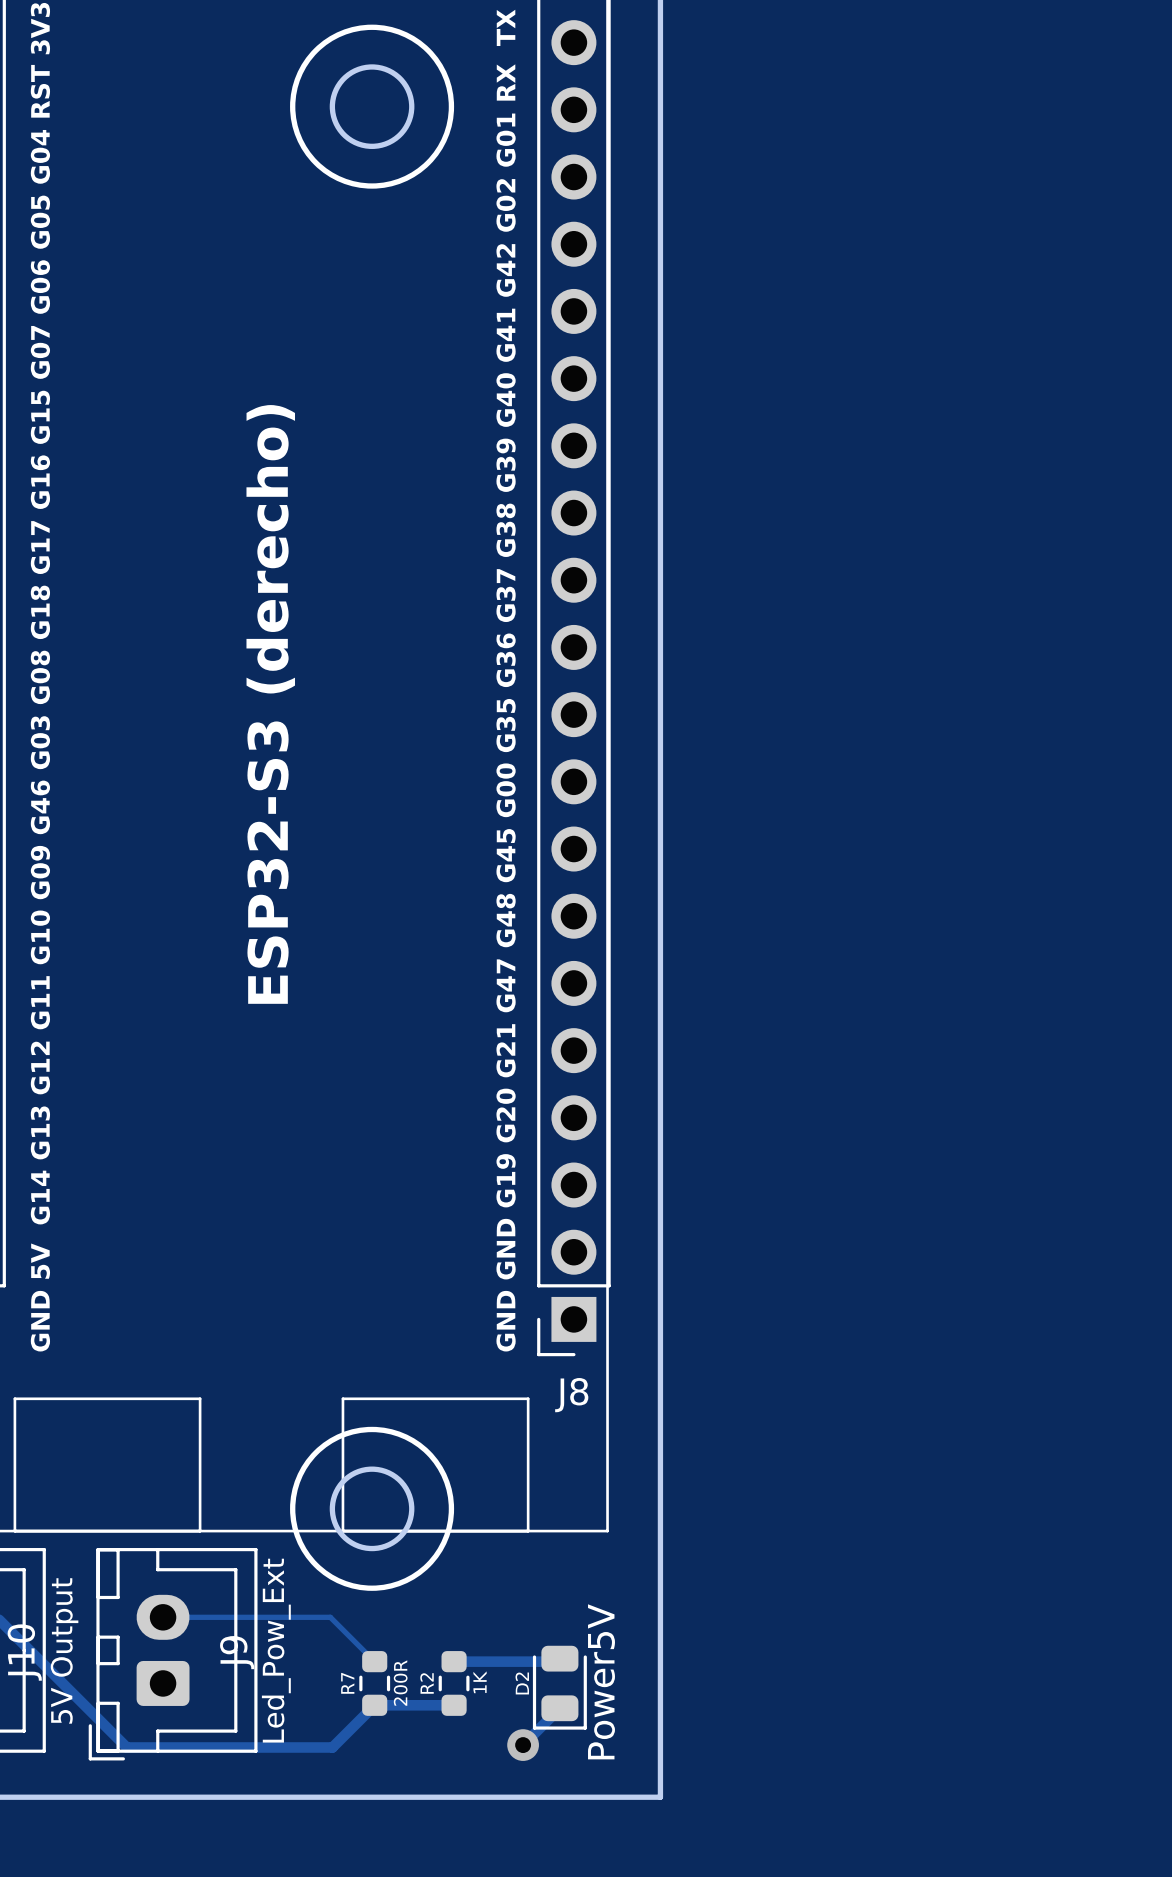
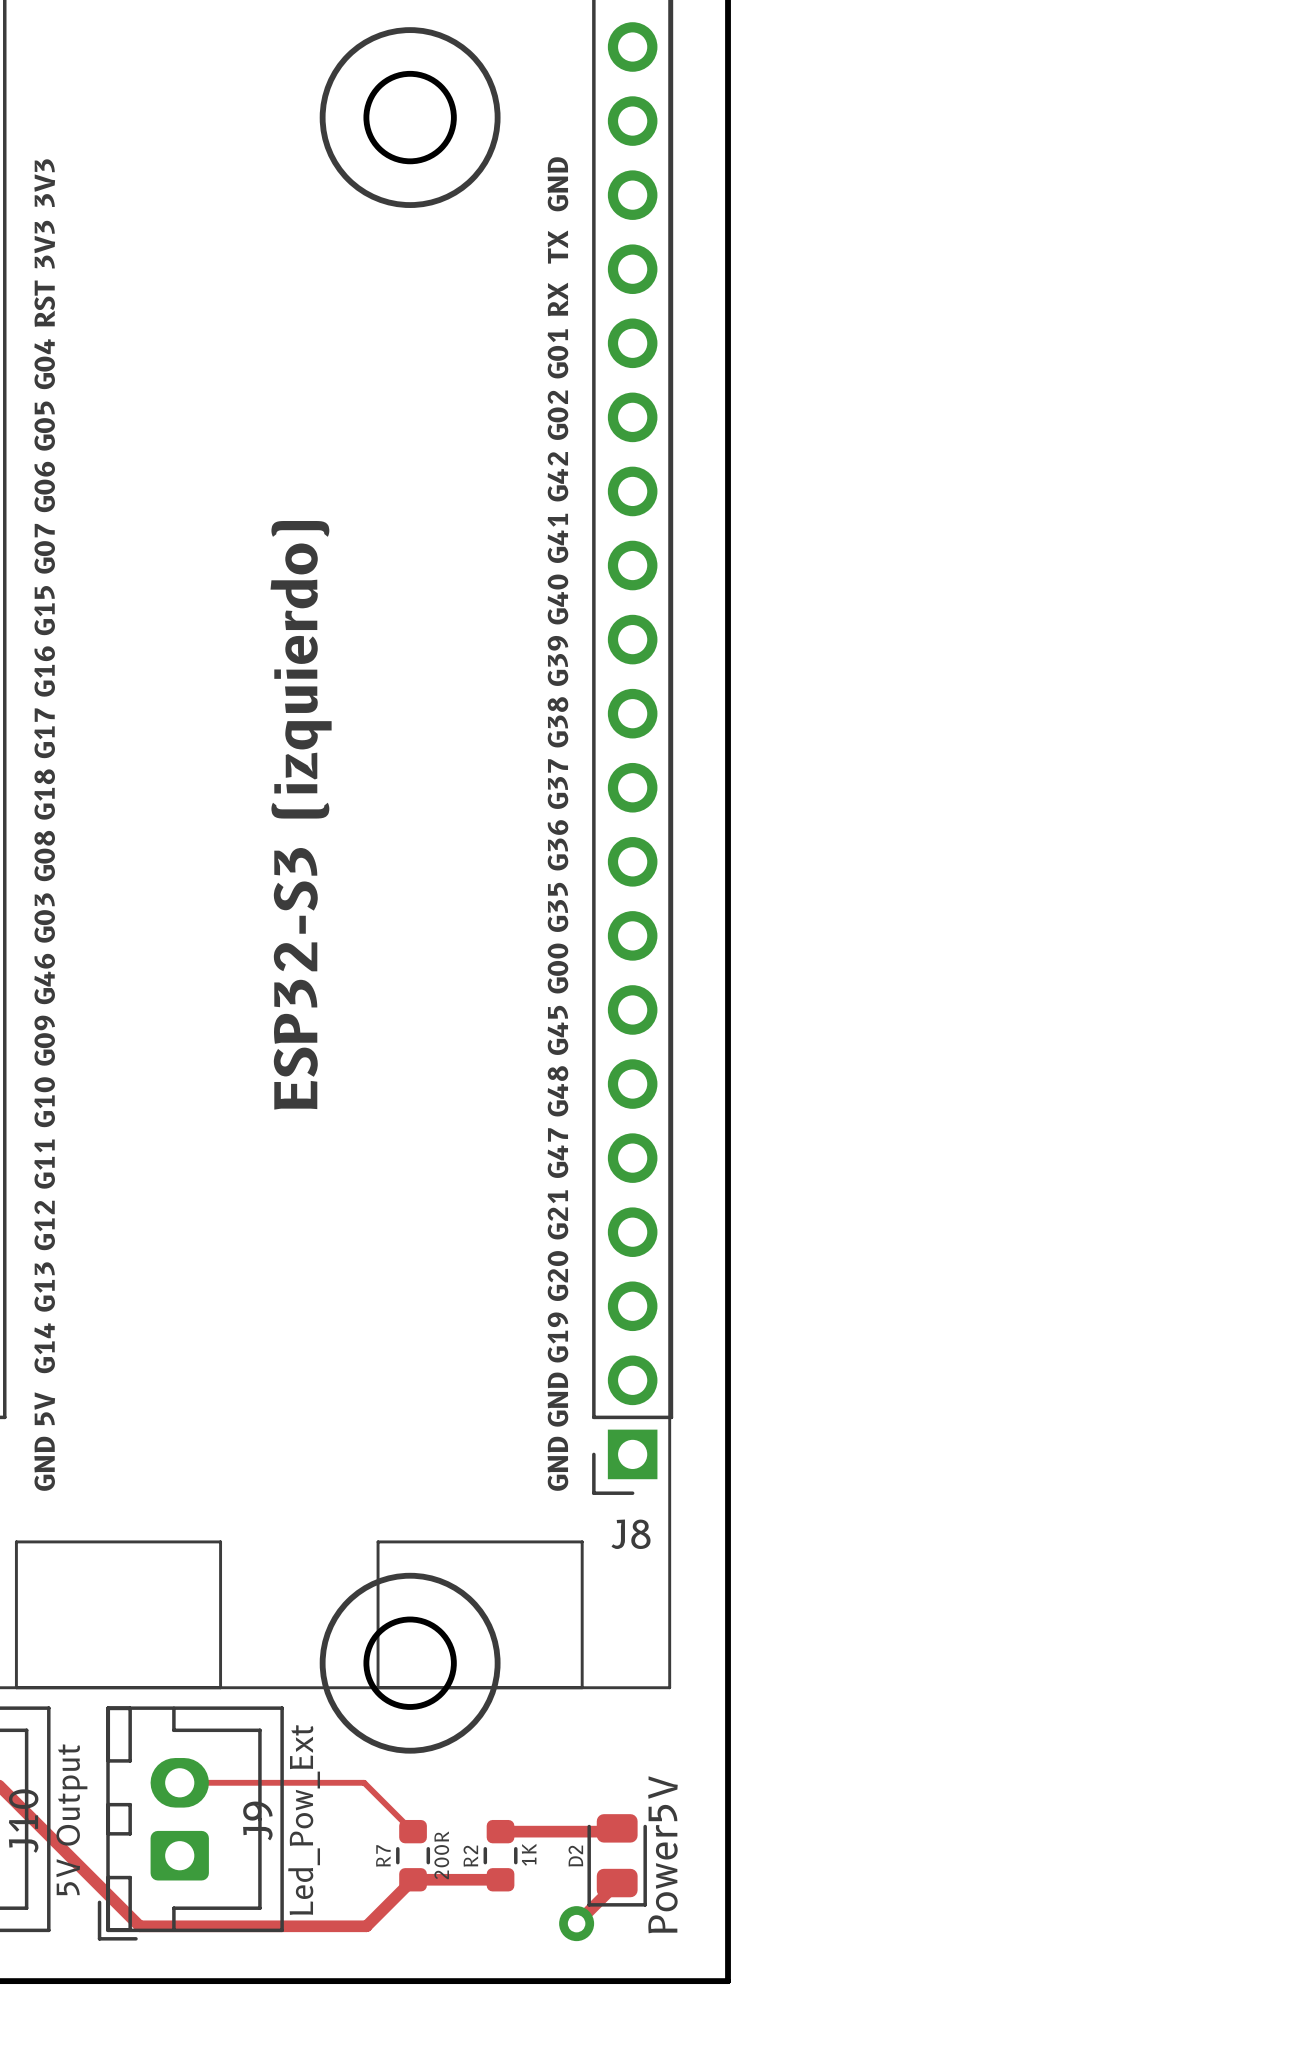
text: ESP32-S3 (derecho) (270, 704) -> ESP32-S3 (izquierdo) (301, 815)

